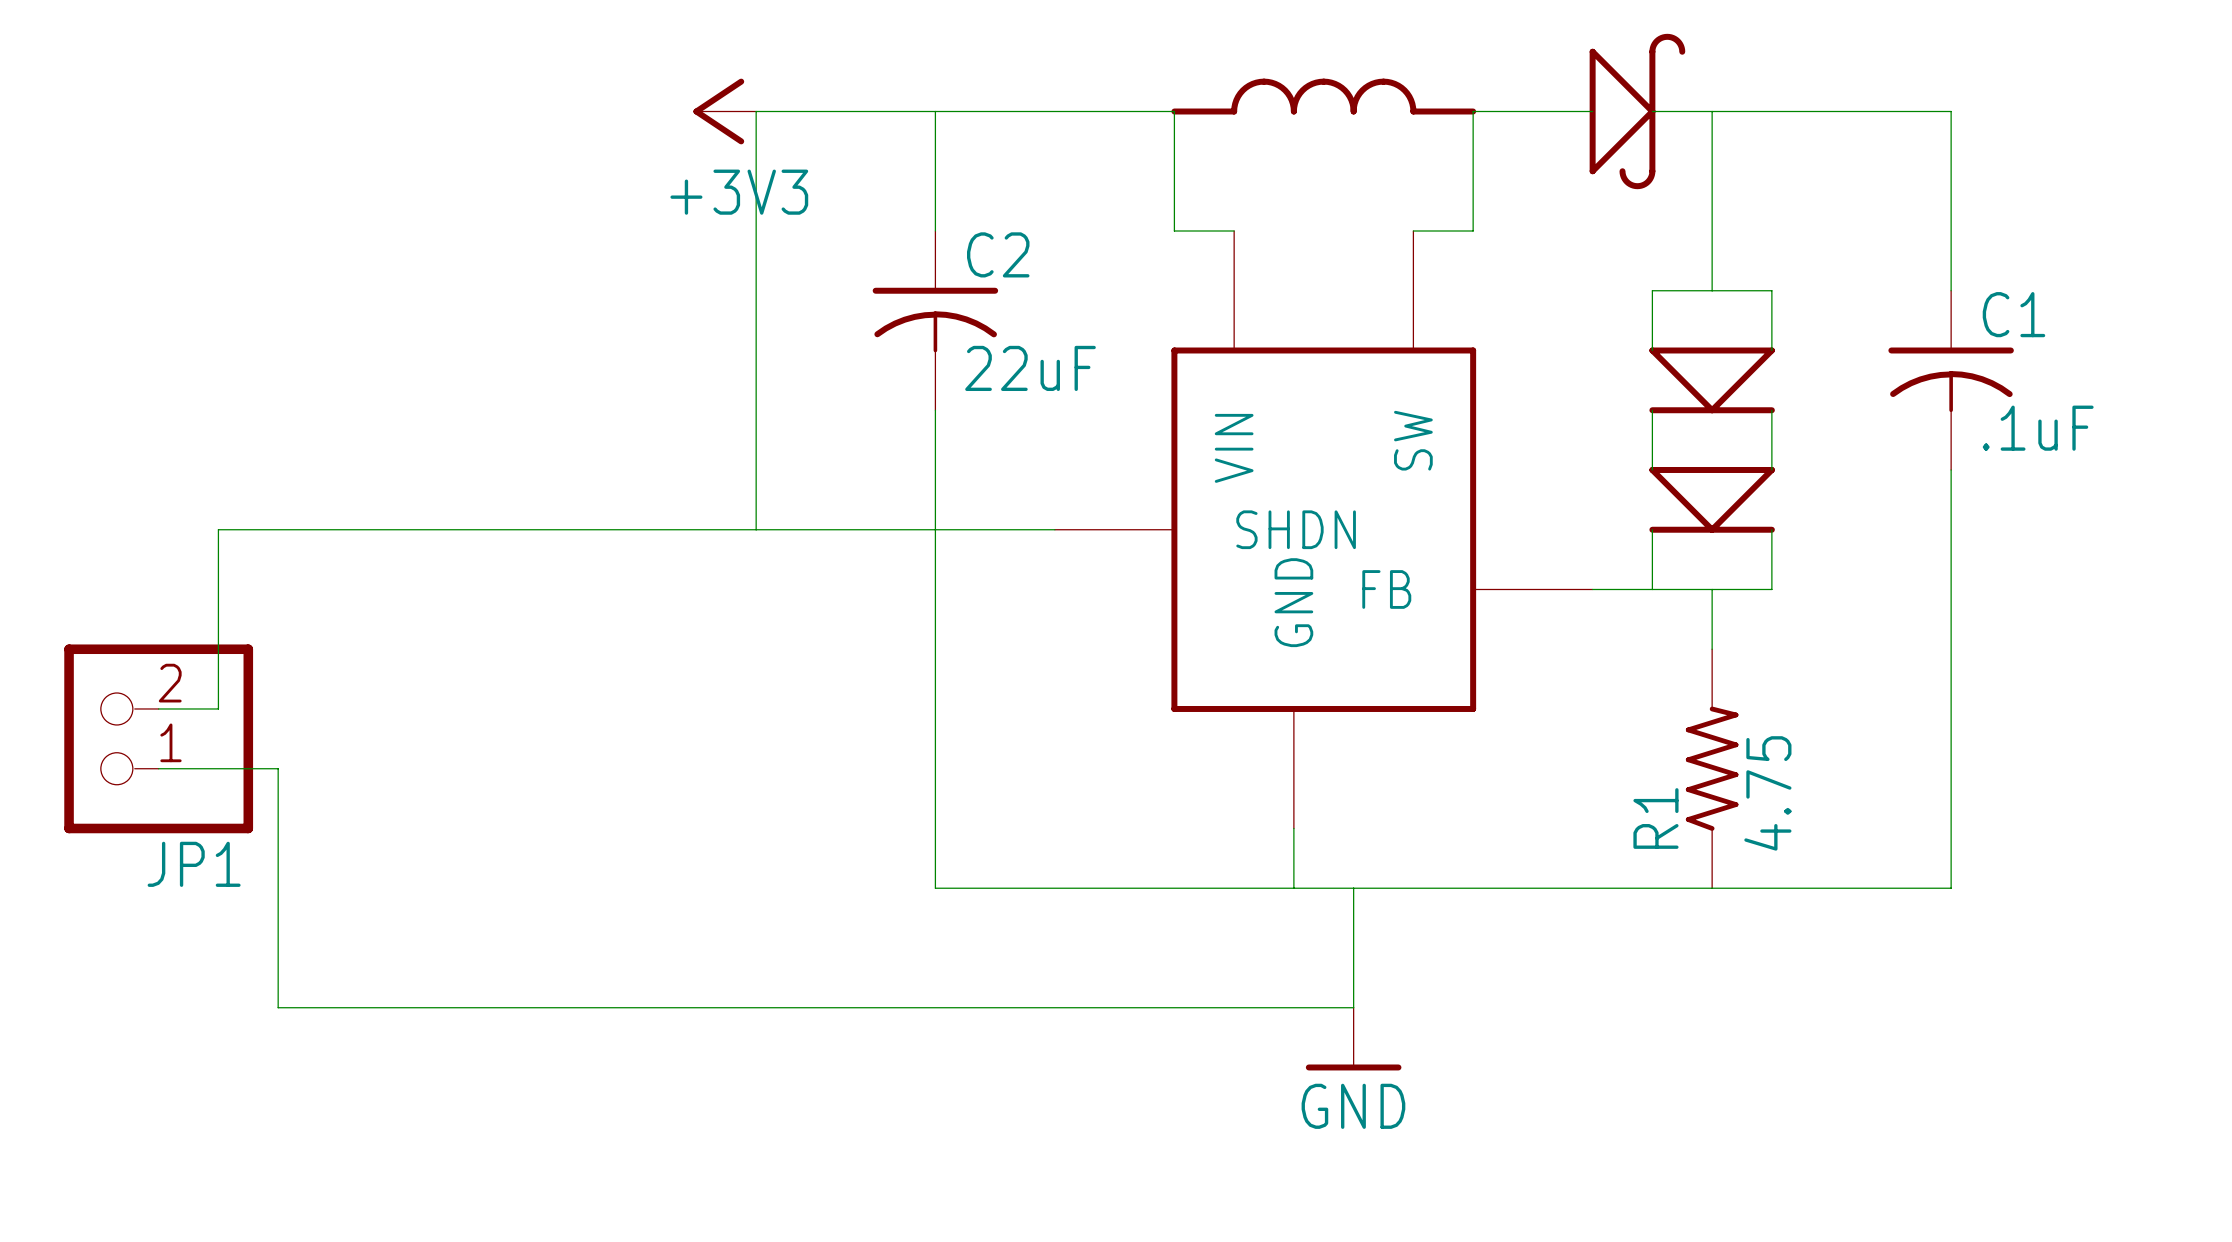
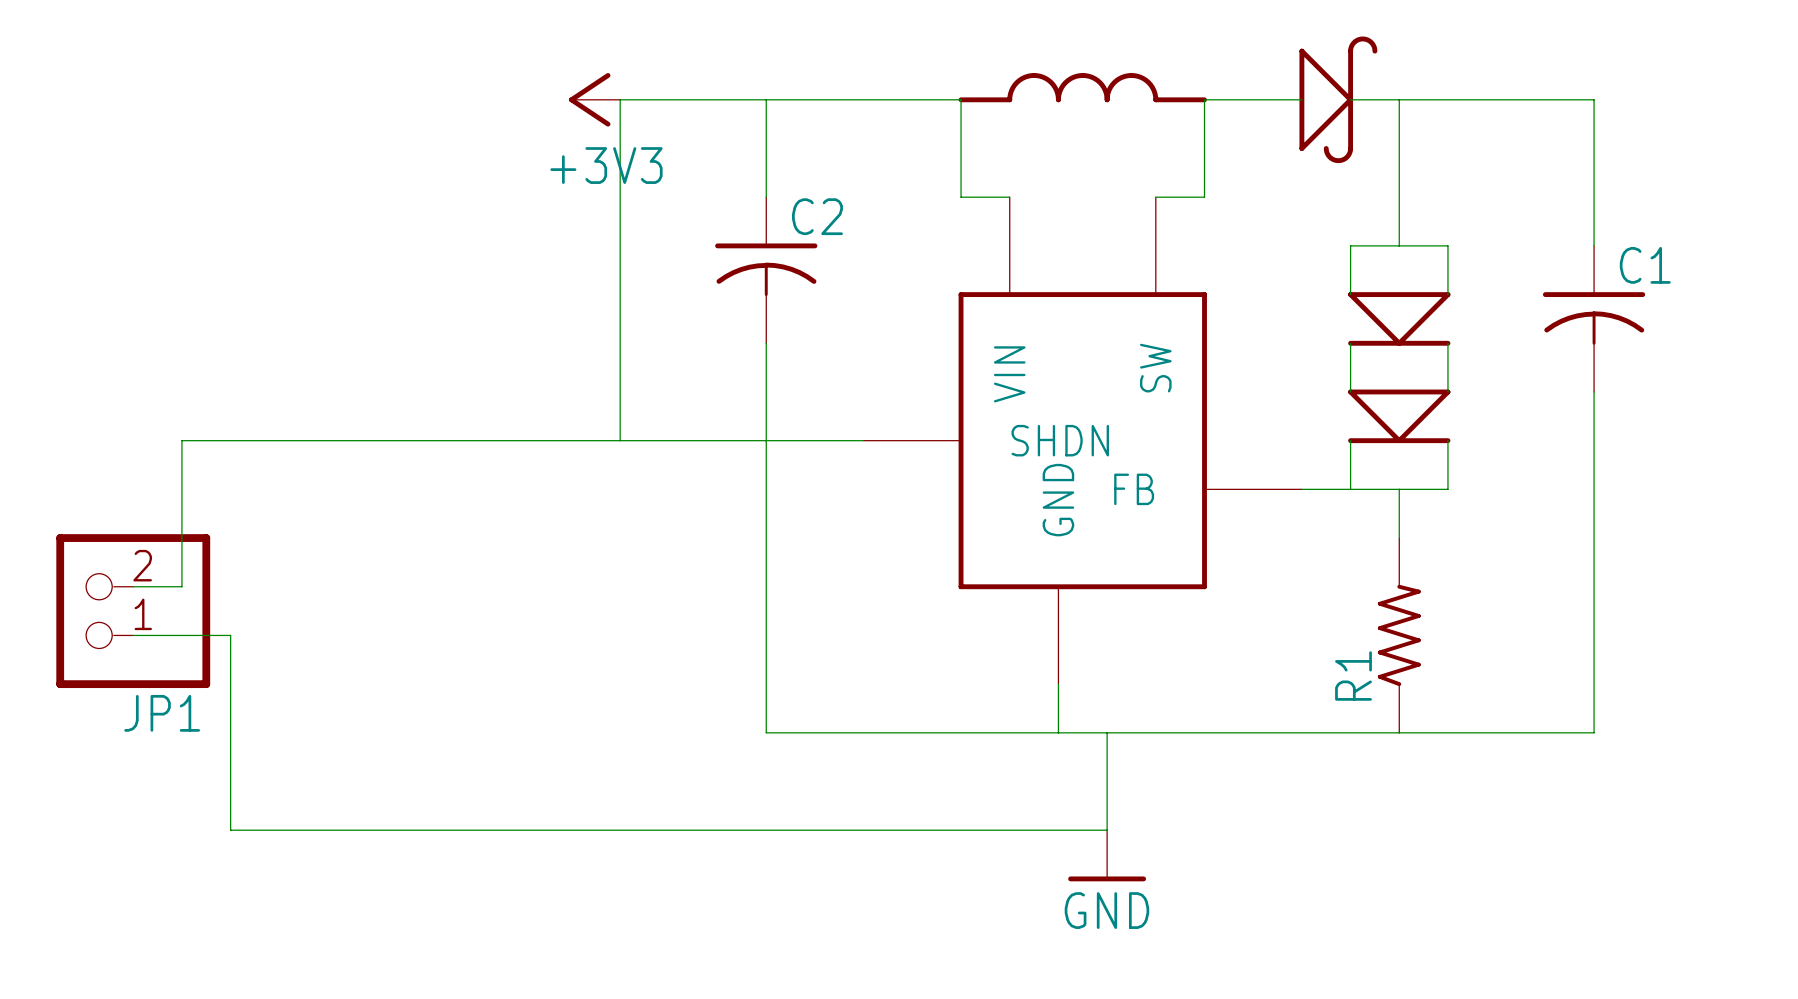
C2 value: 22uF (1030, 368) -> none
C1 value: .1uF (2038, 428) -> none
R1 value: 4.75 (1767, 793) -> none

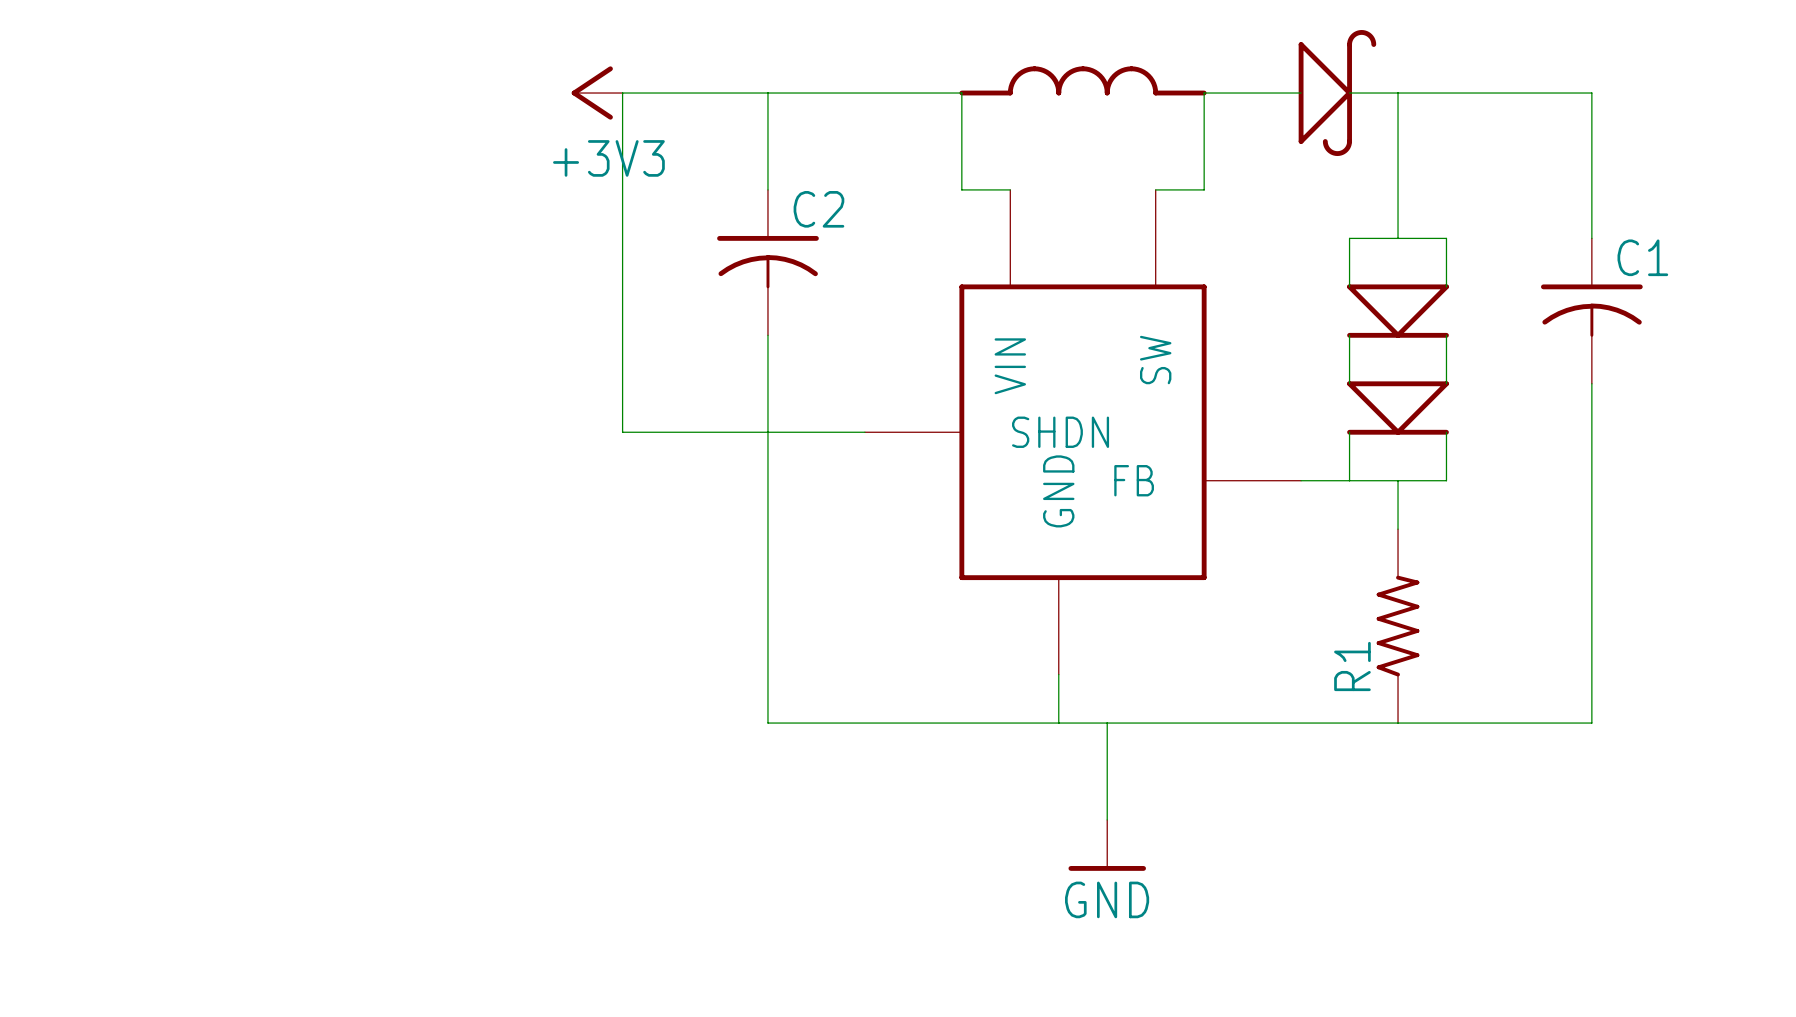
wire: (620, 440) (181, 440) (181, 586) (133, 586) -> none
JP1: (133, 611) -> none
wire: (133, 635) (230, 635) (230, 830) (1107, 830) -> none

